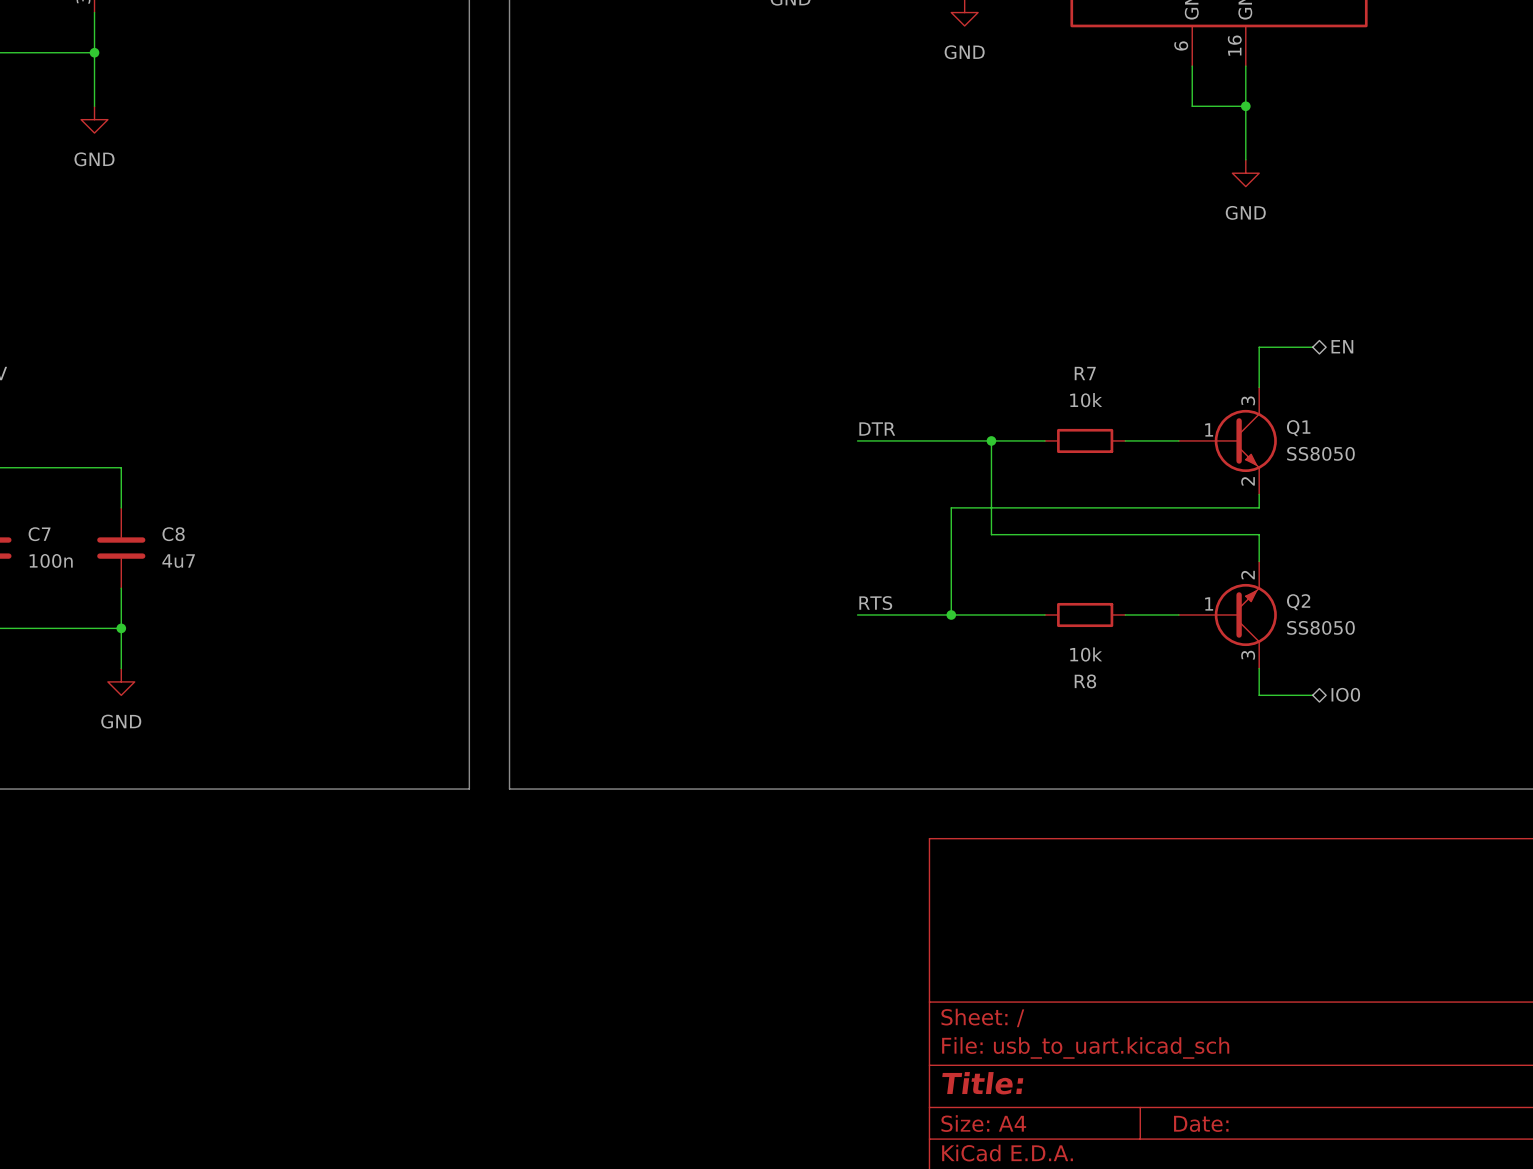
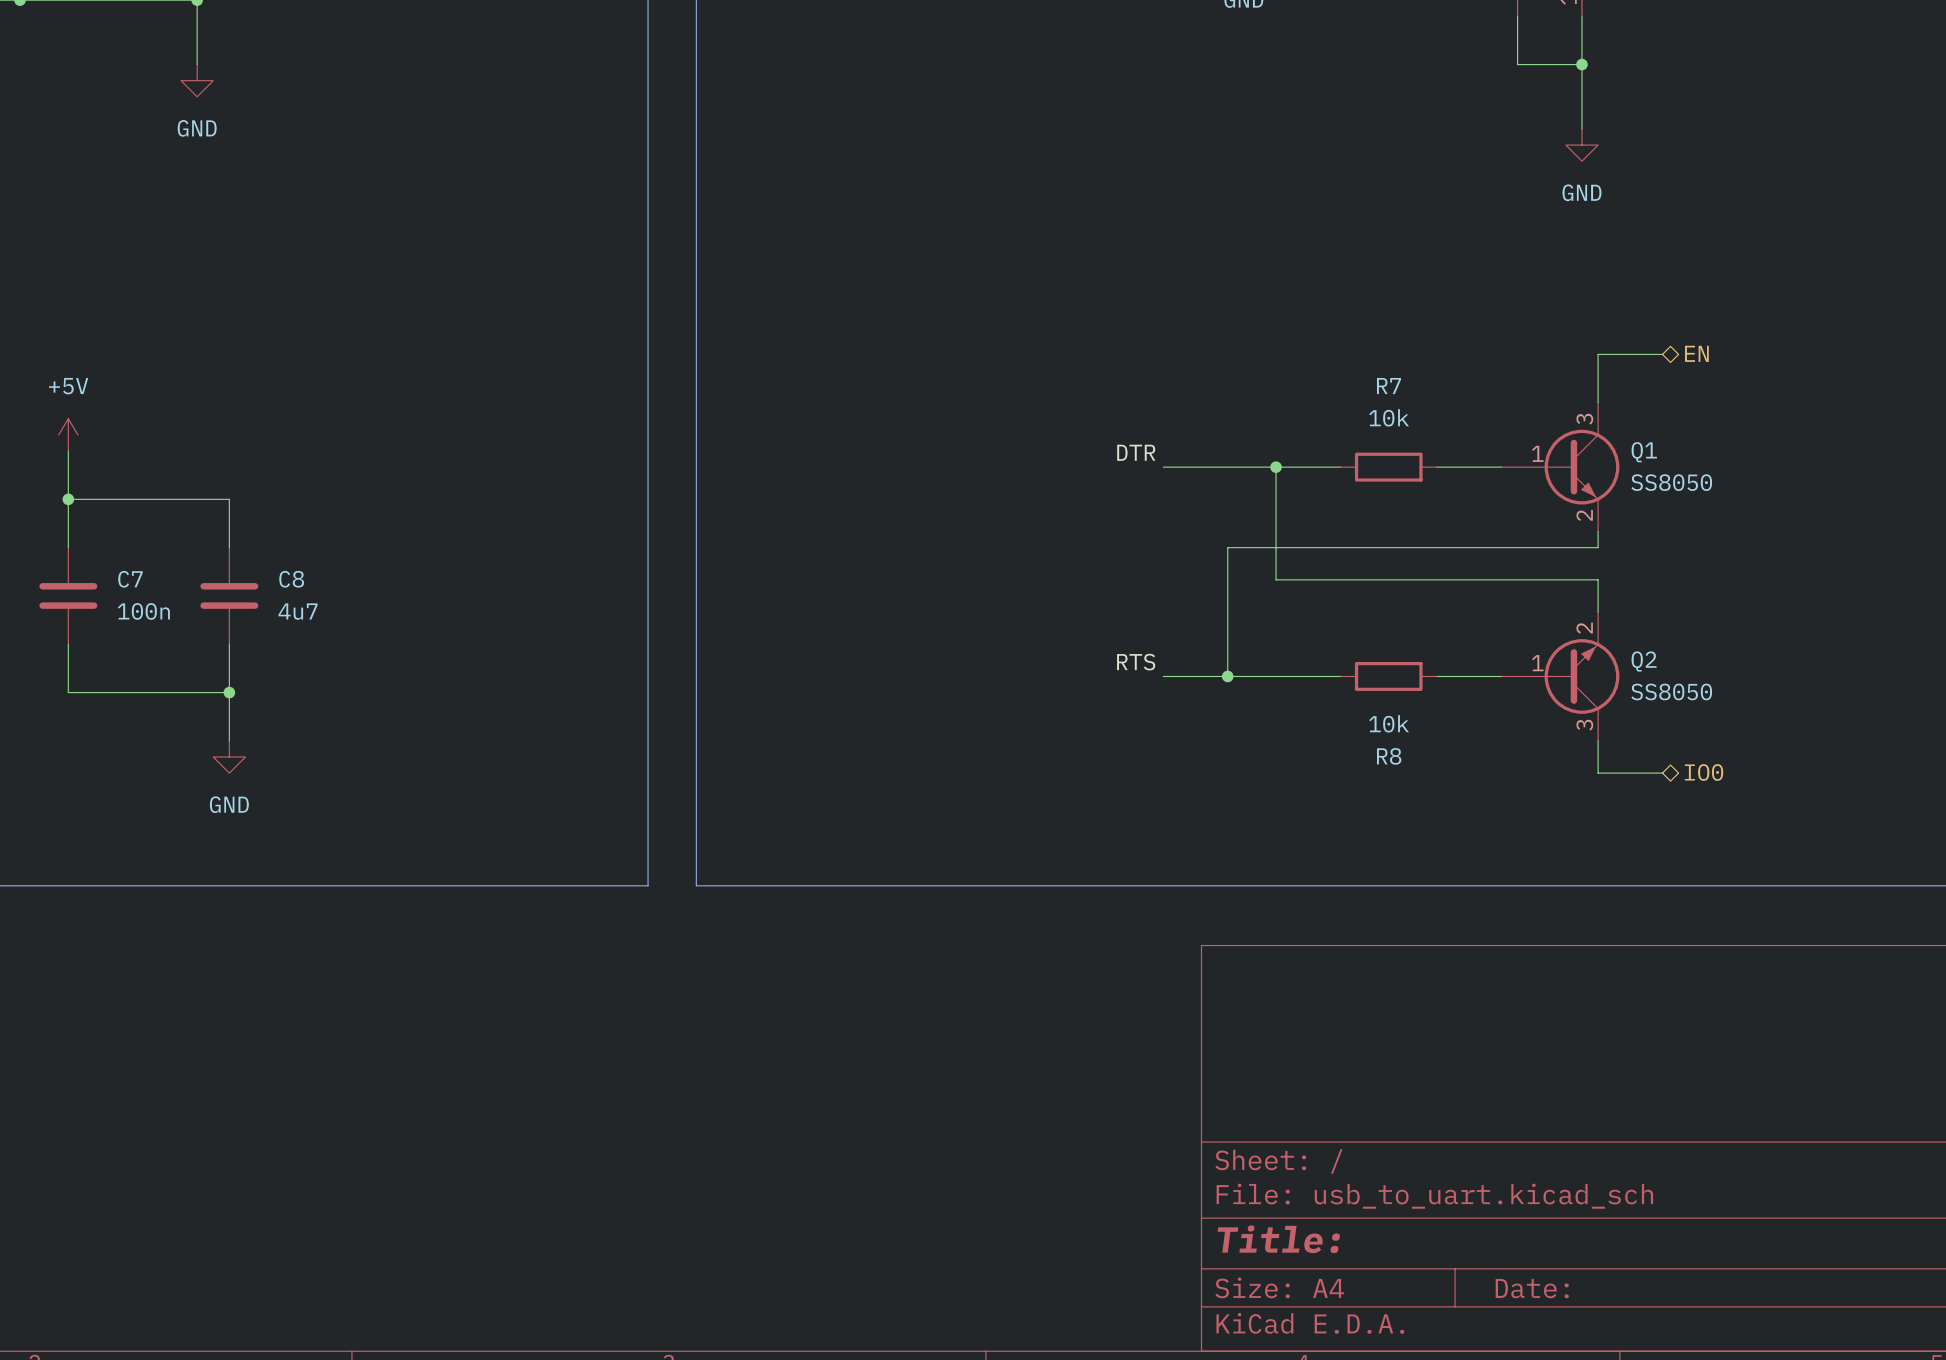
wire: (857, 440) (897, 440) -> none
wire: (857, 614) (897, 614) -> none

